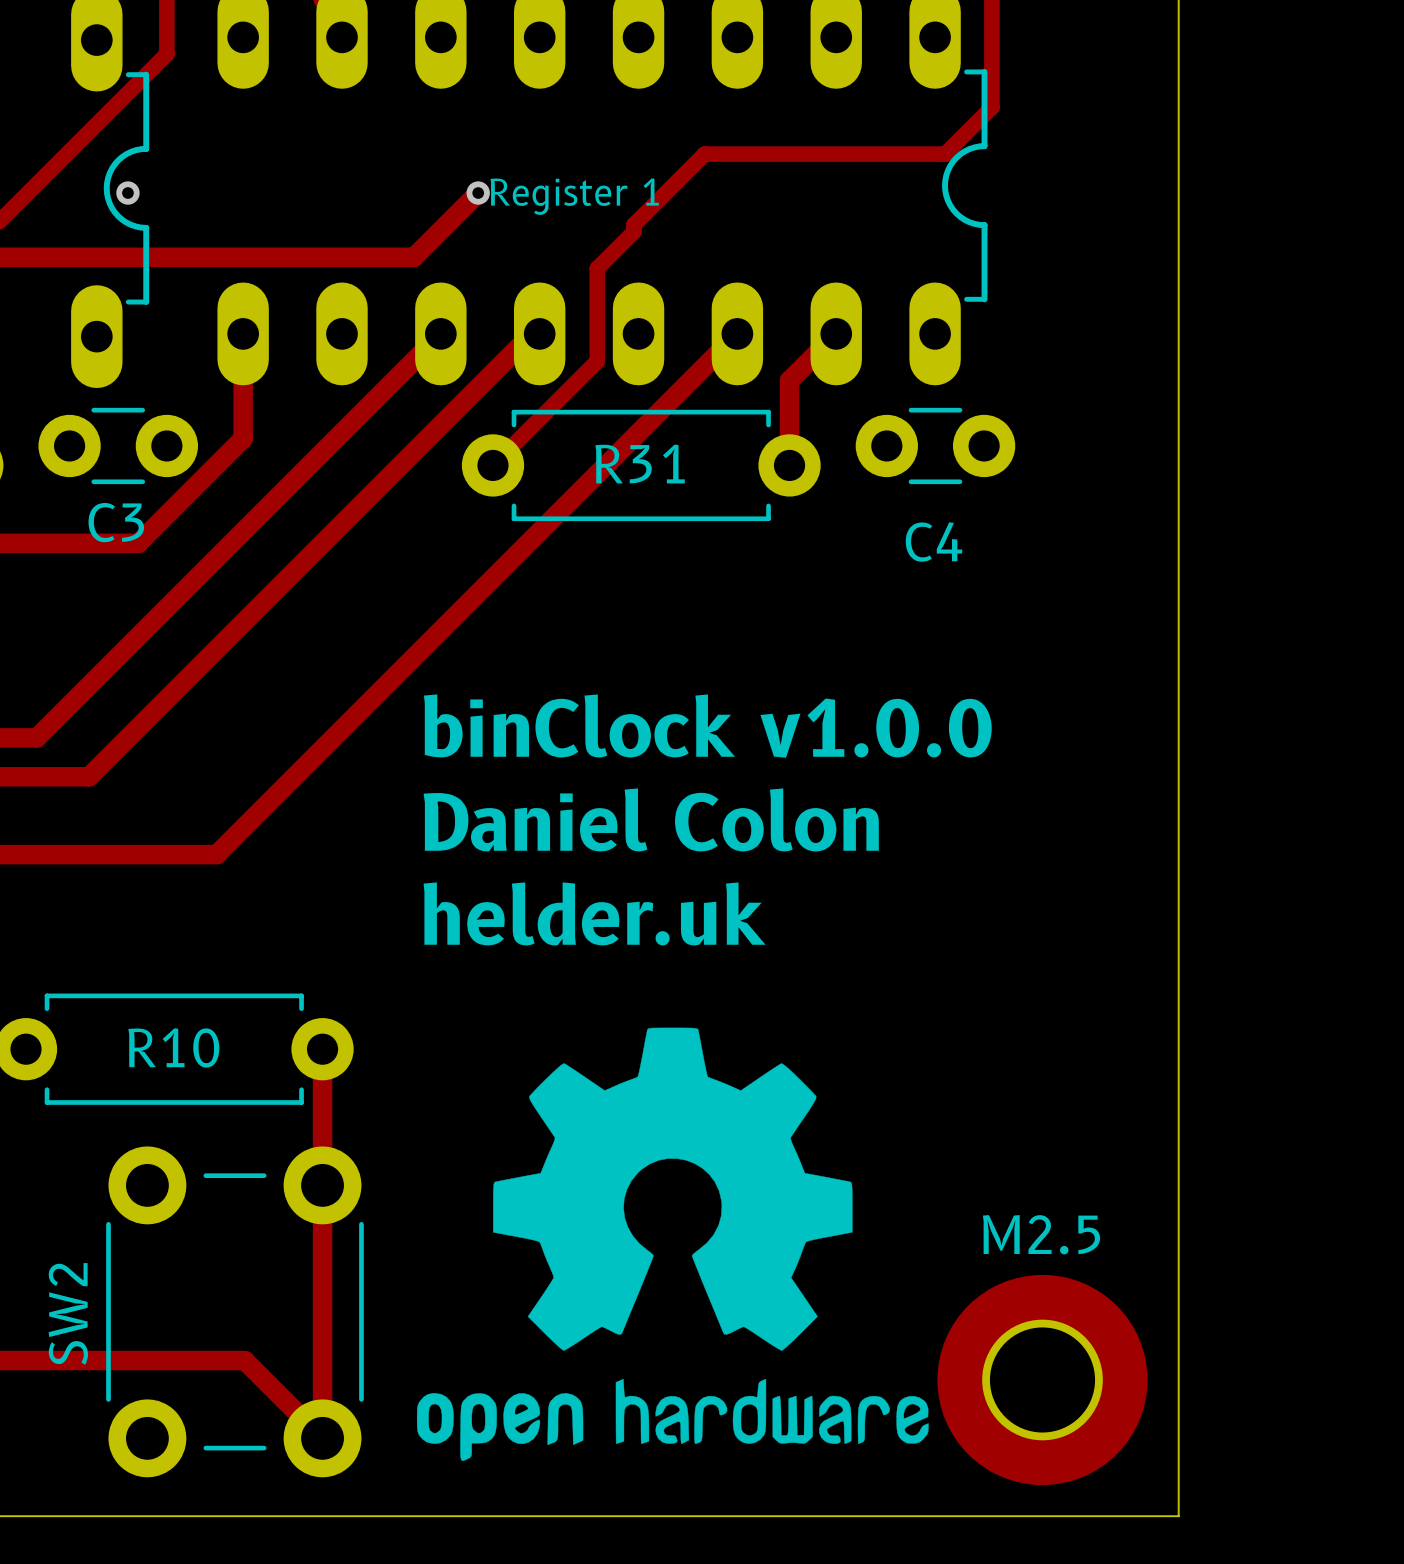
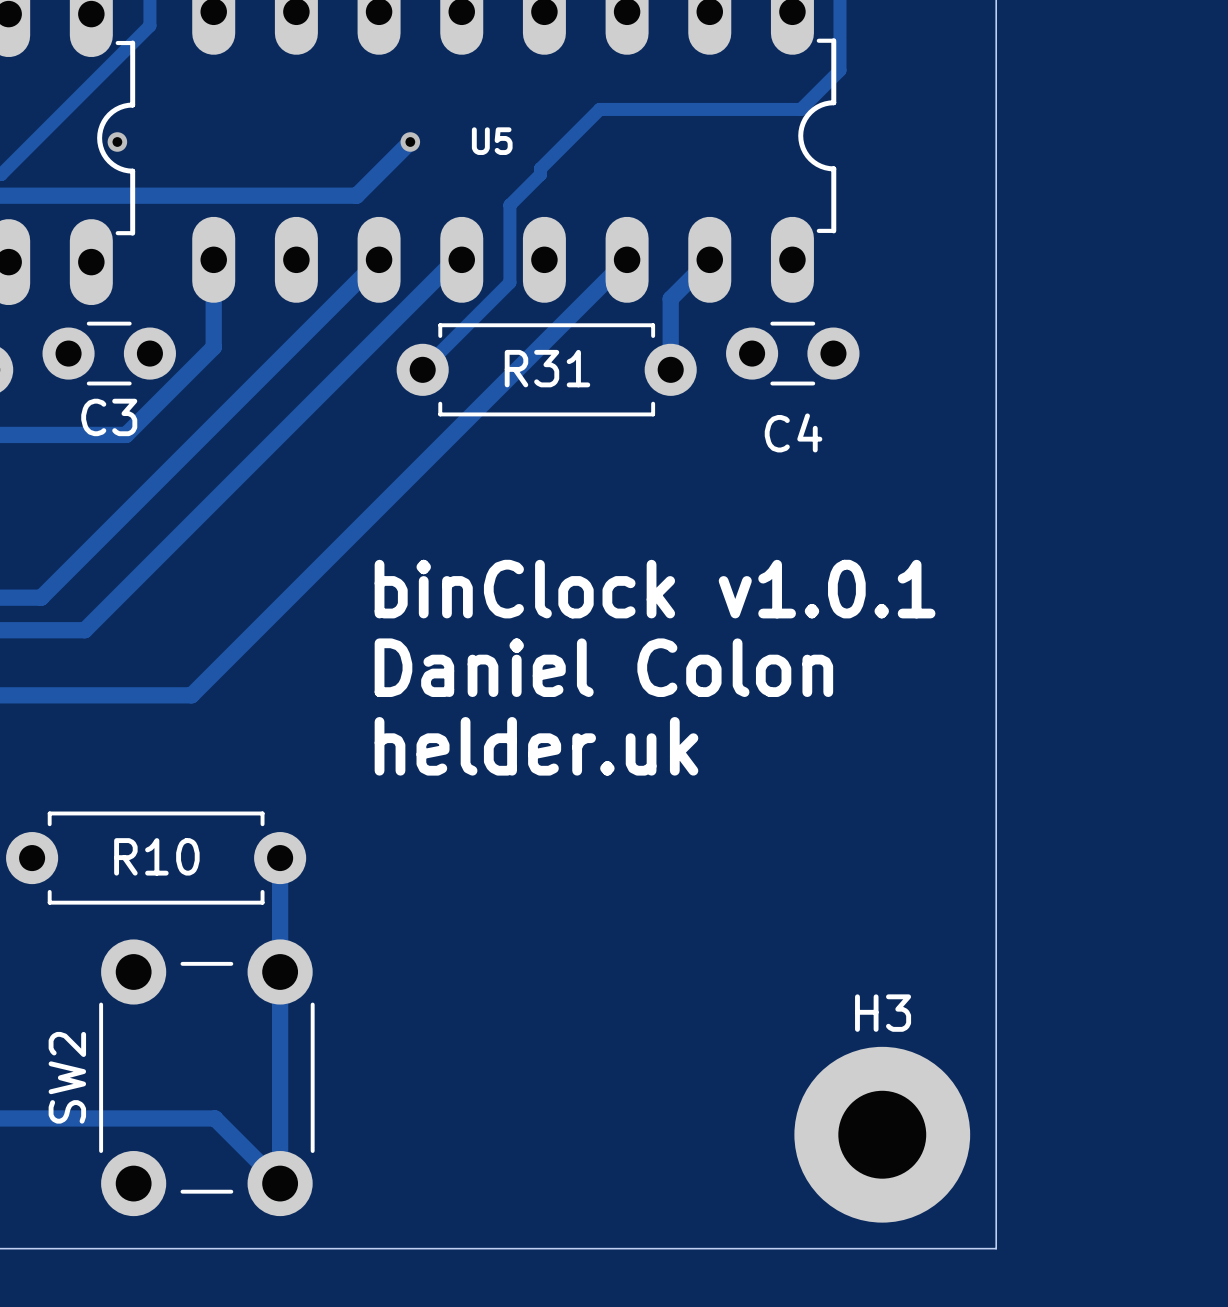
Register 1 name: Register 1 (574, 196) -> U5 (492, 141)
text: binClock v1.0.0 (707, 726) -> binClock v1.0.1 (655, 589)
drawing: [416, 1027, 929, 1461] -> none
M2.5 name: M2.5 (1041, 1234) -> H3 (883, 1013)

